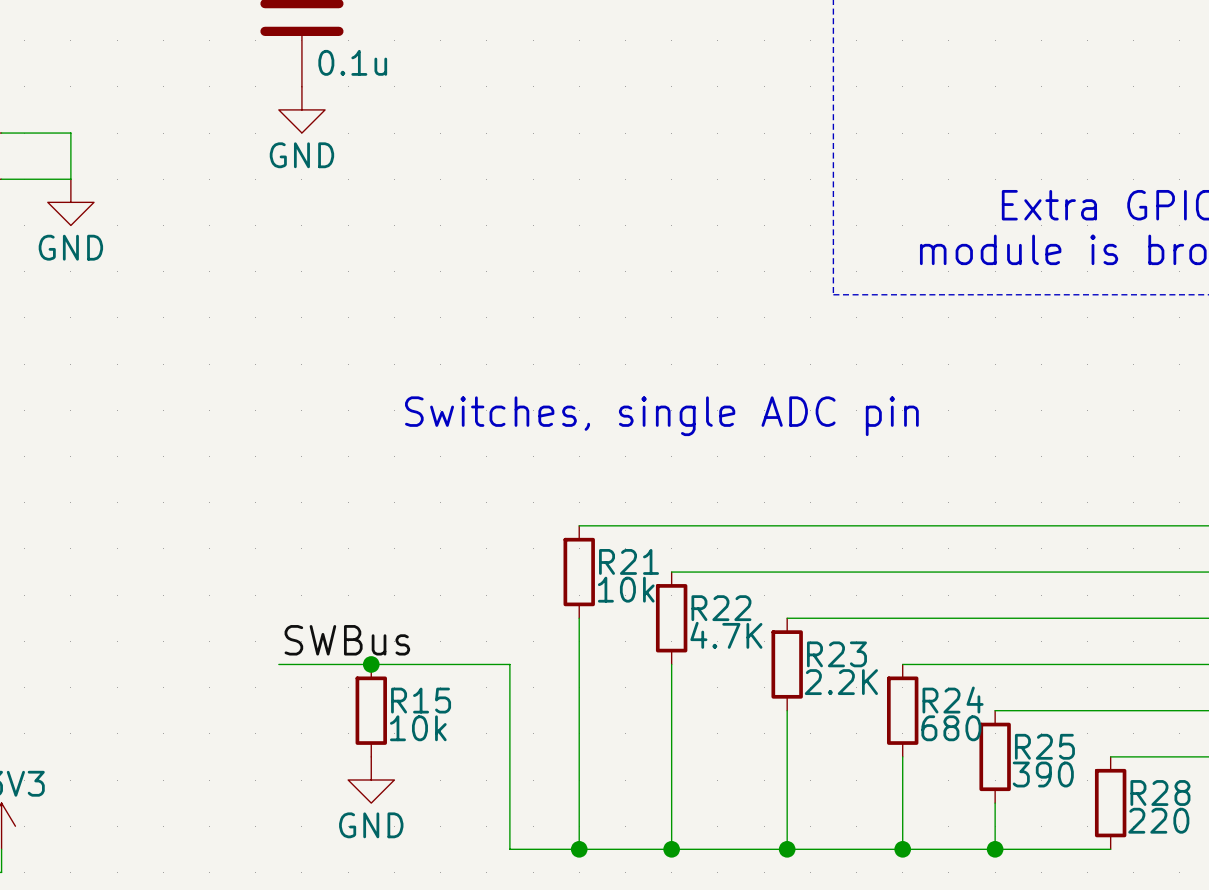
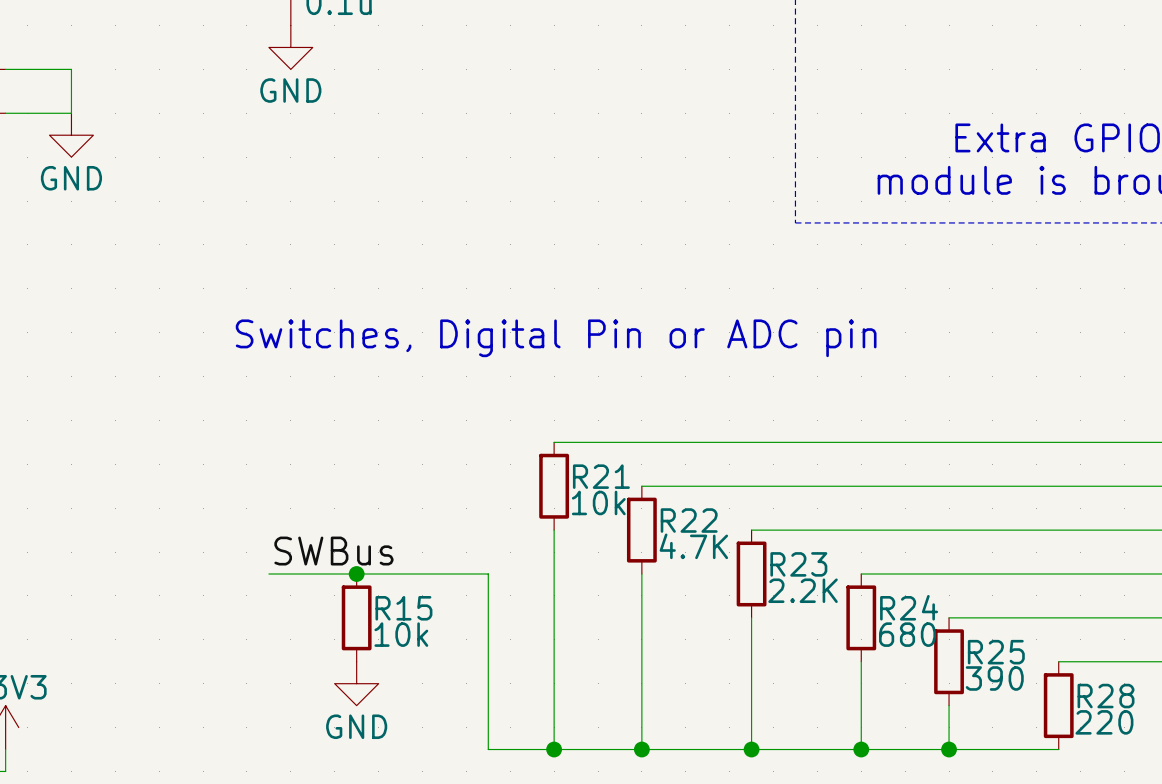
text: Switches, single ADC pin (661, 416) -> Switches, Digital Pin or ADC pin (556, 338)

